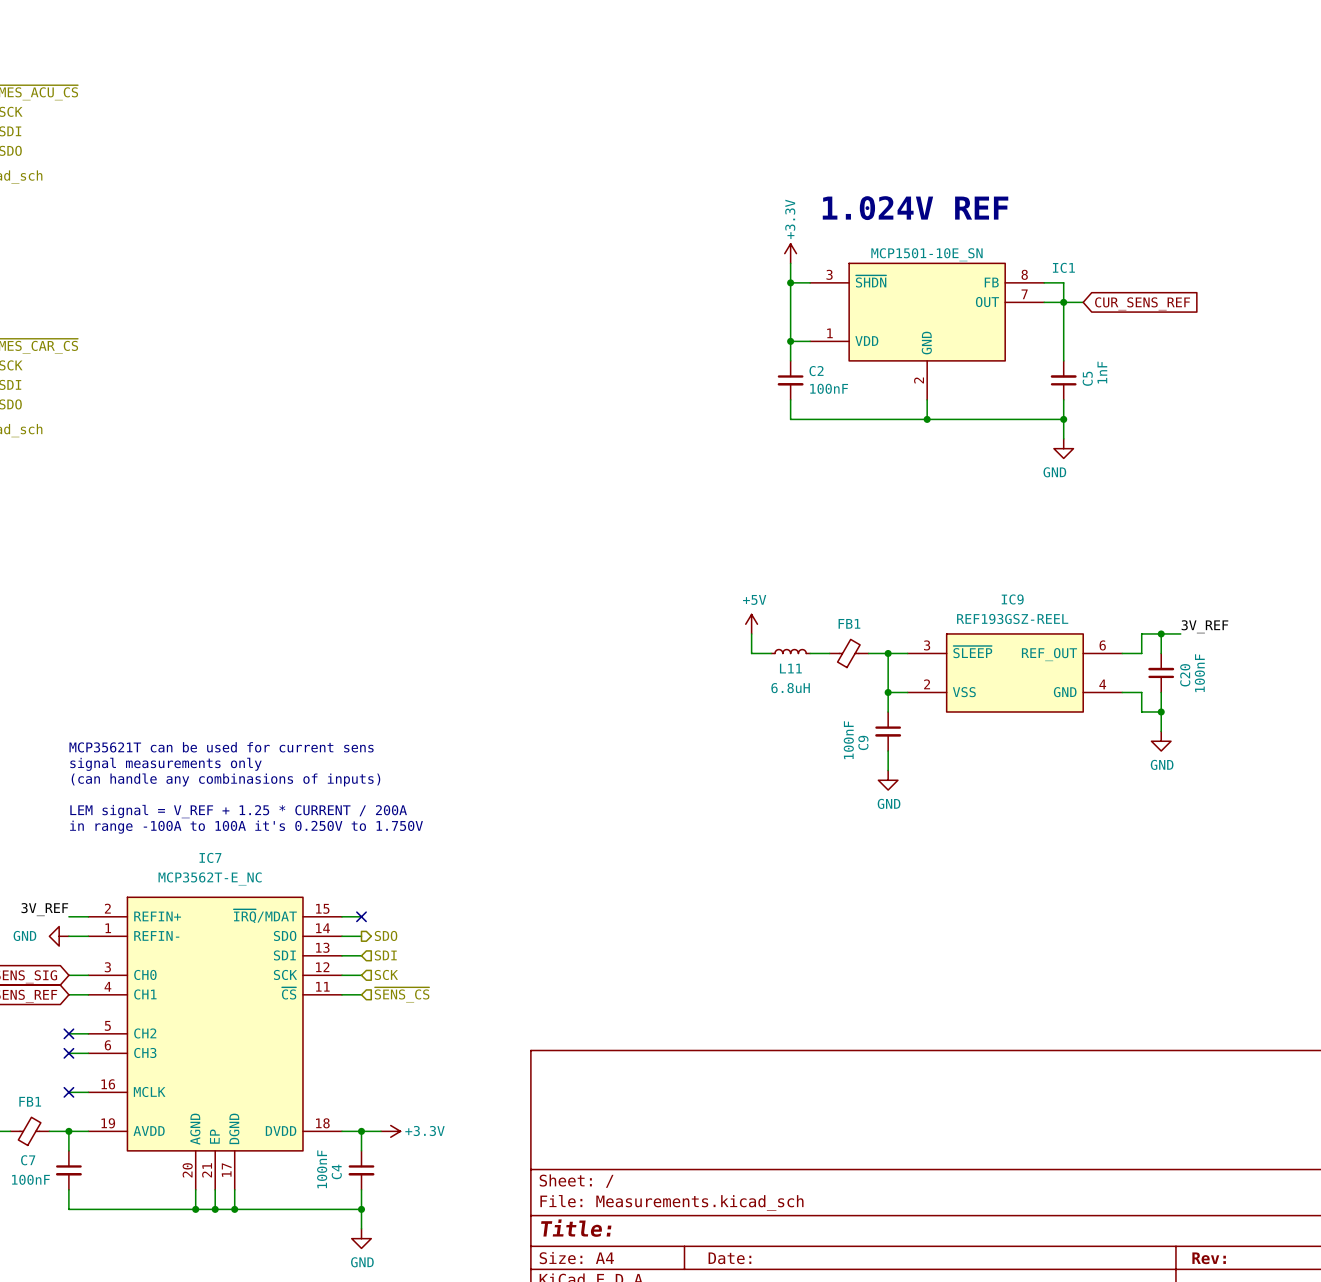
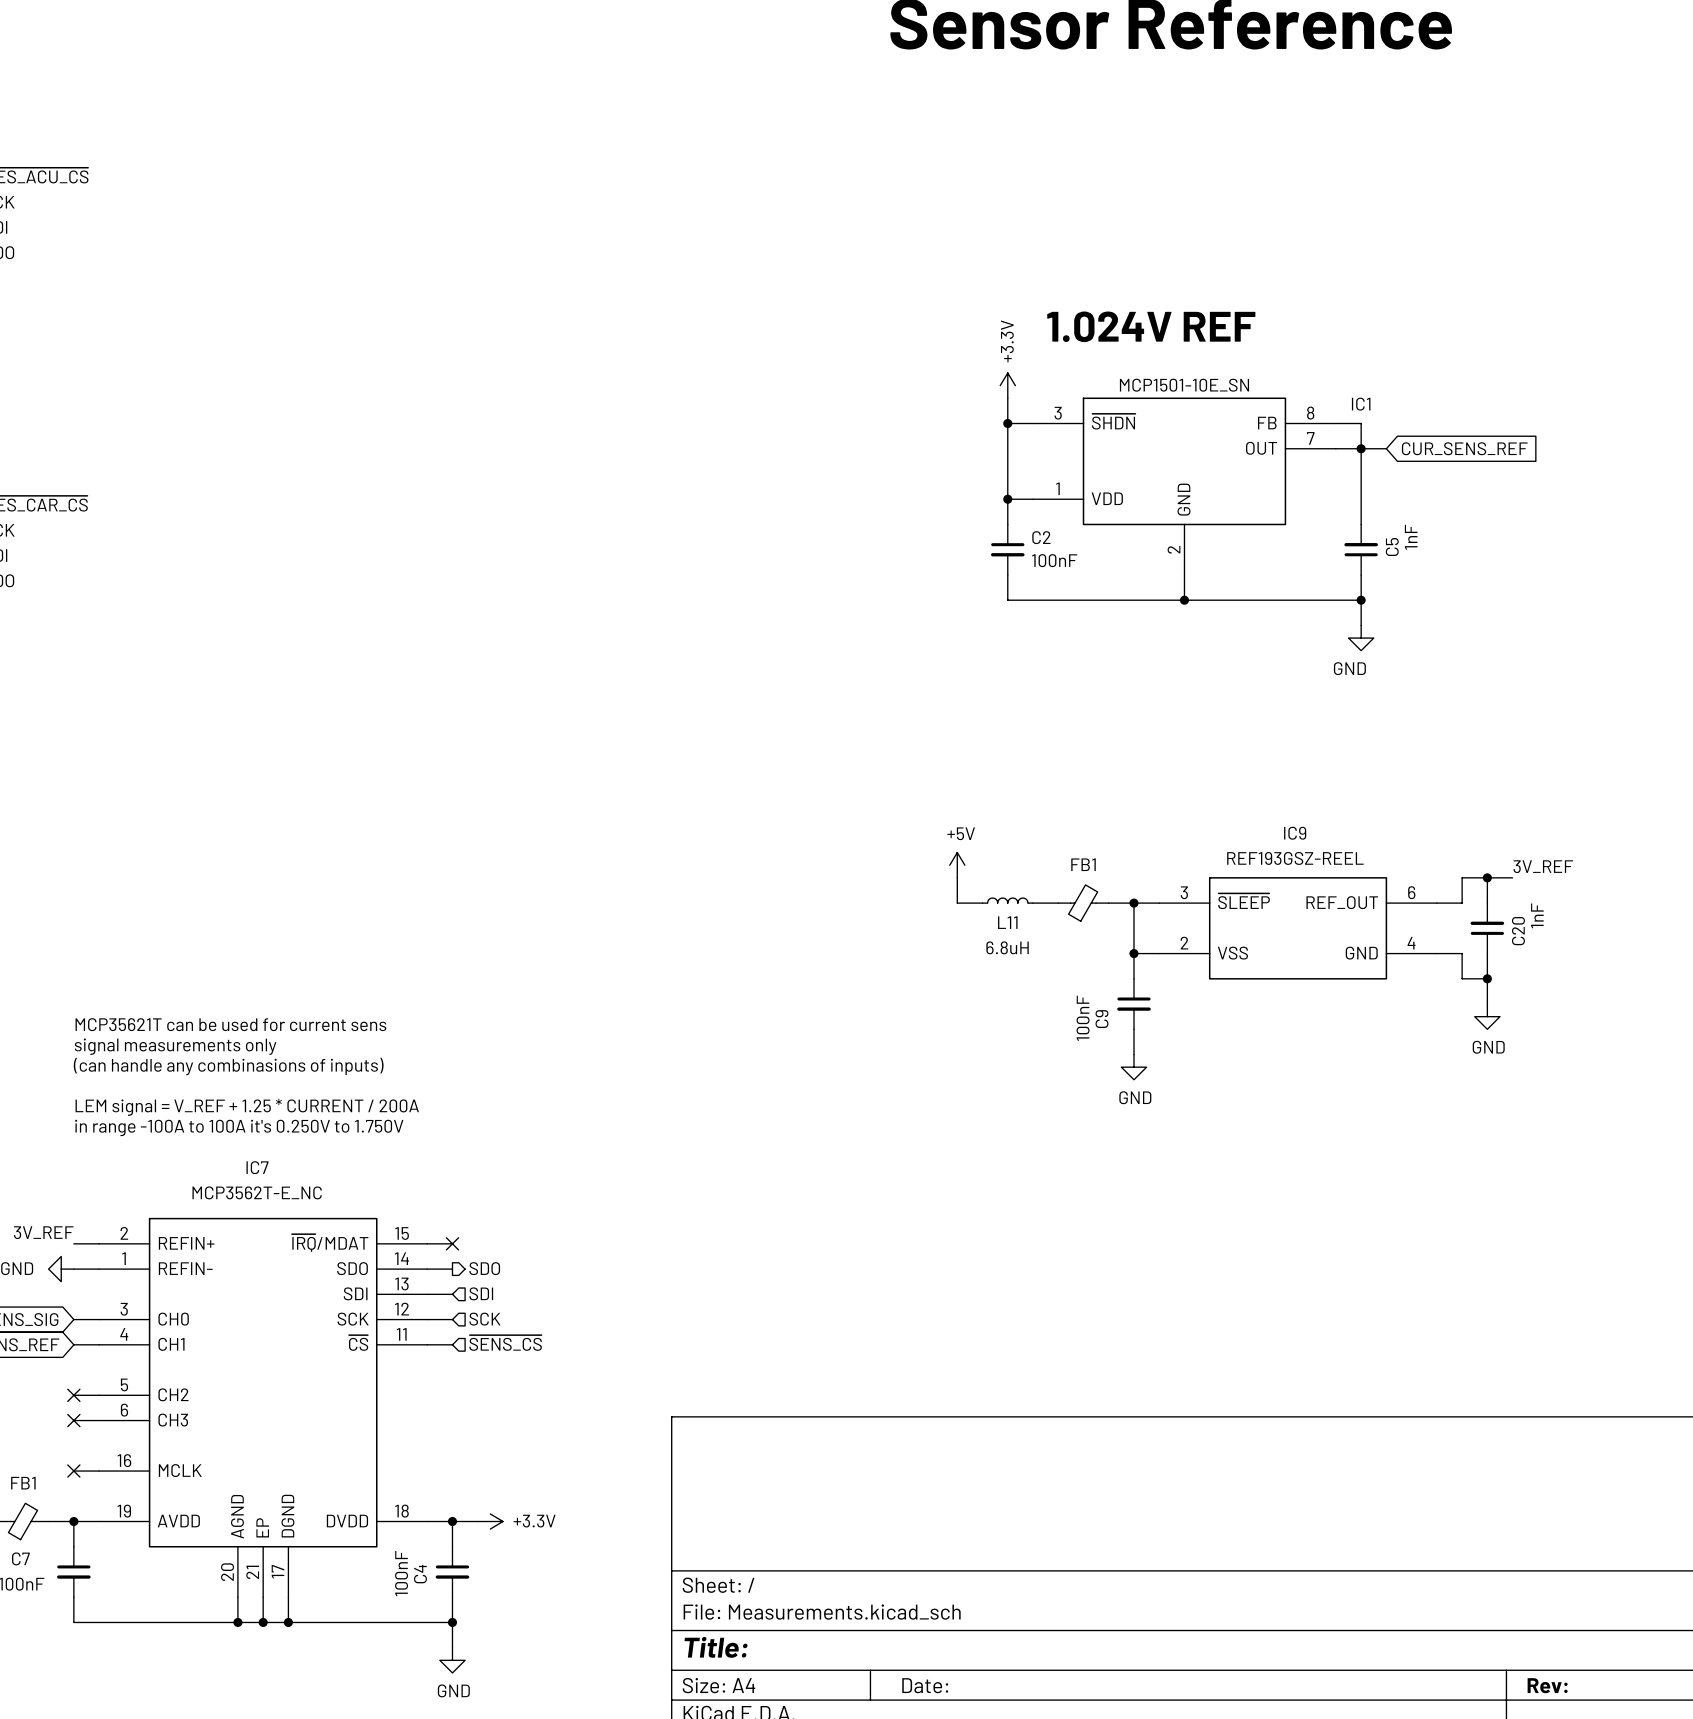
C20 value: 100nF (1199, 673) -> 1nF (1537, 915)

